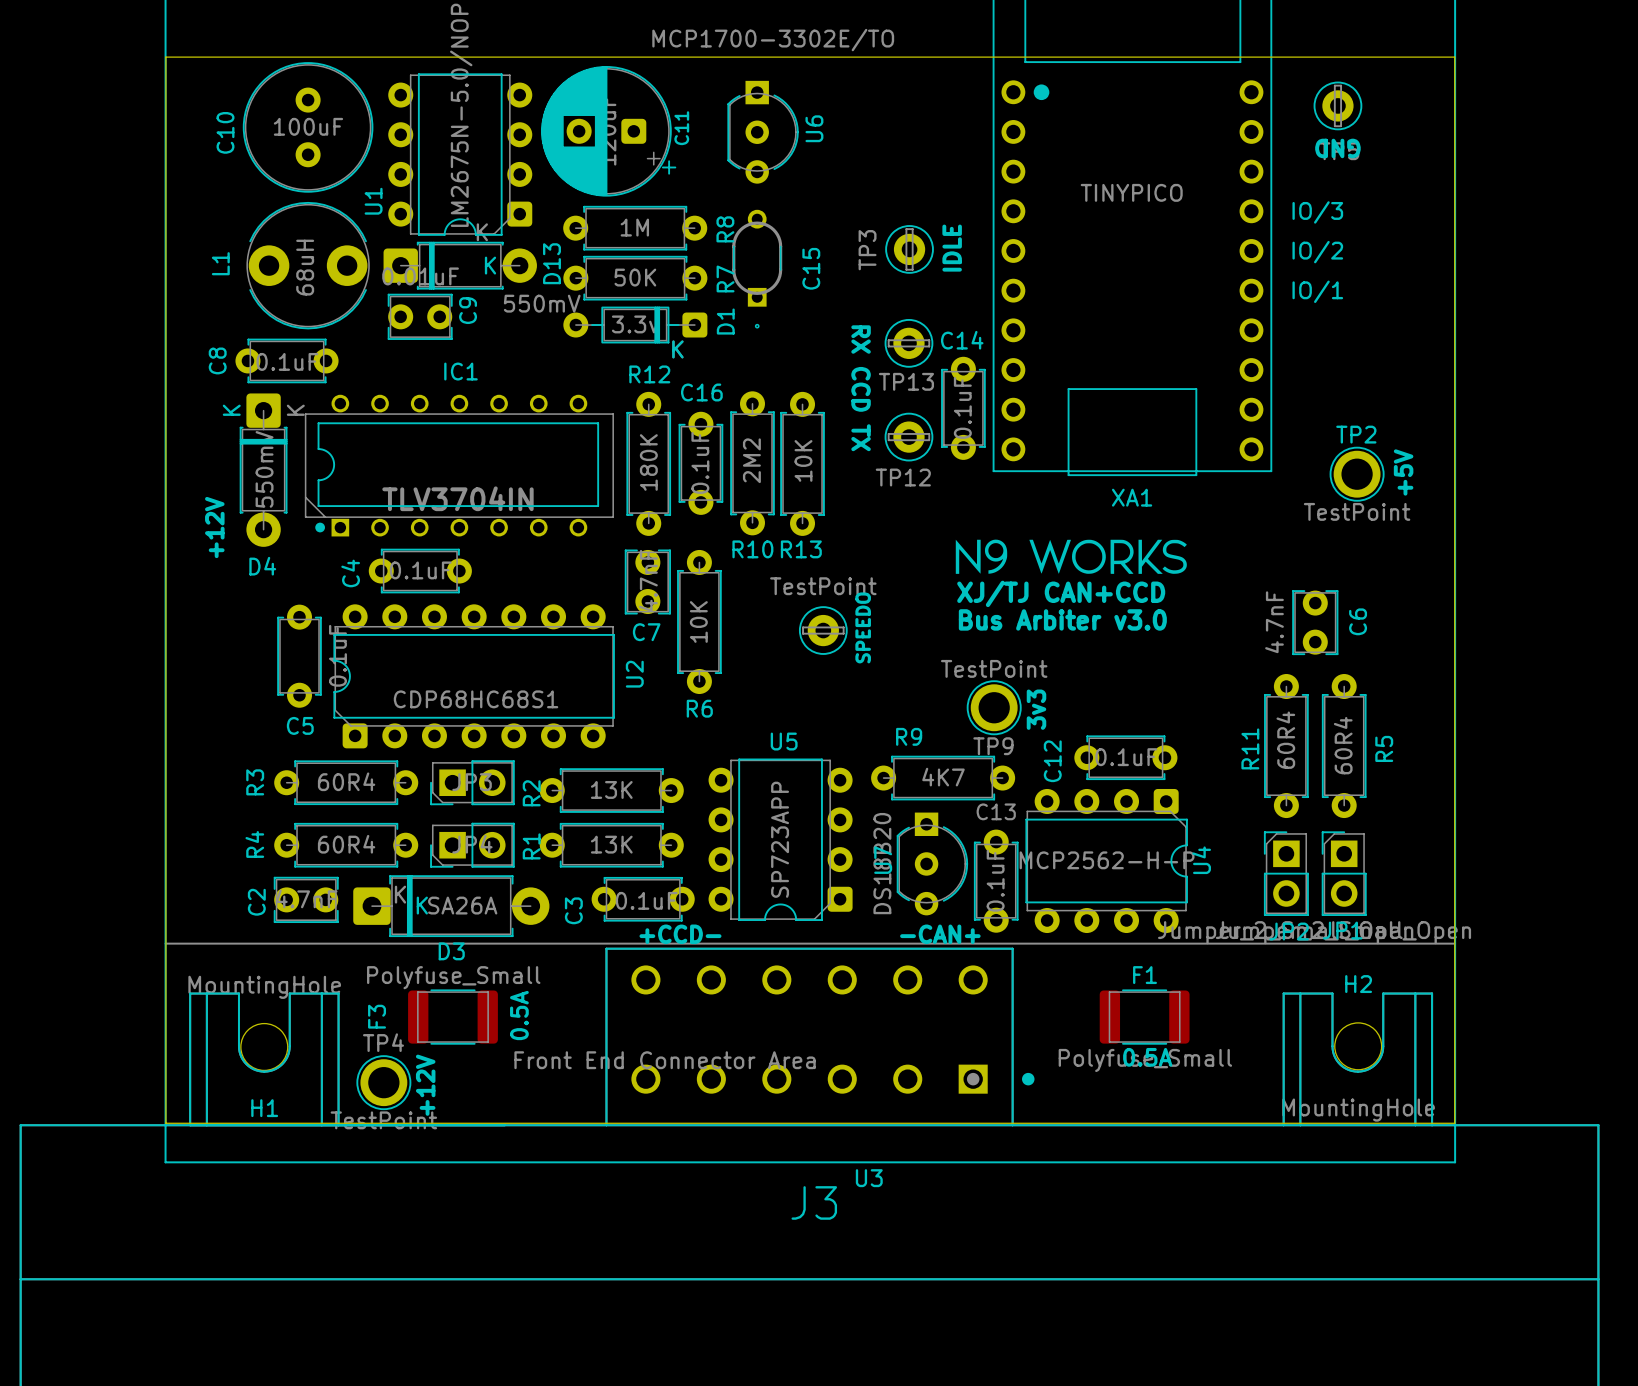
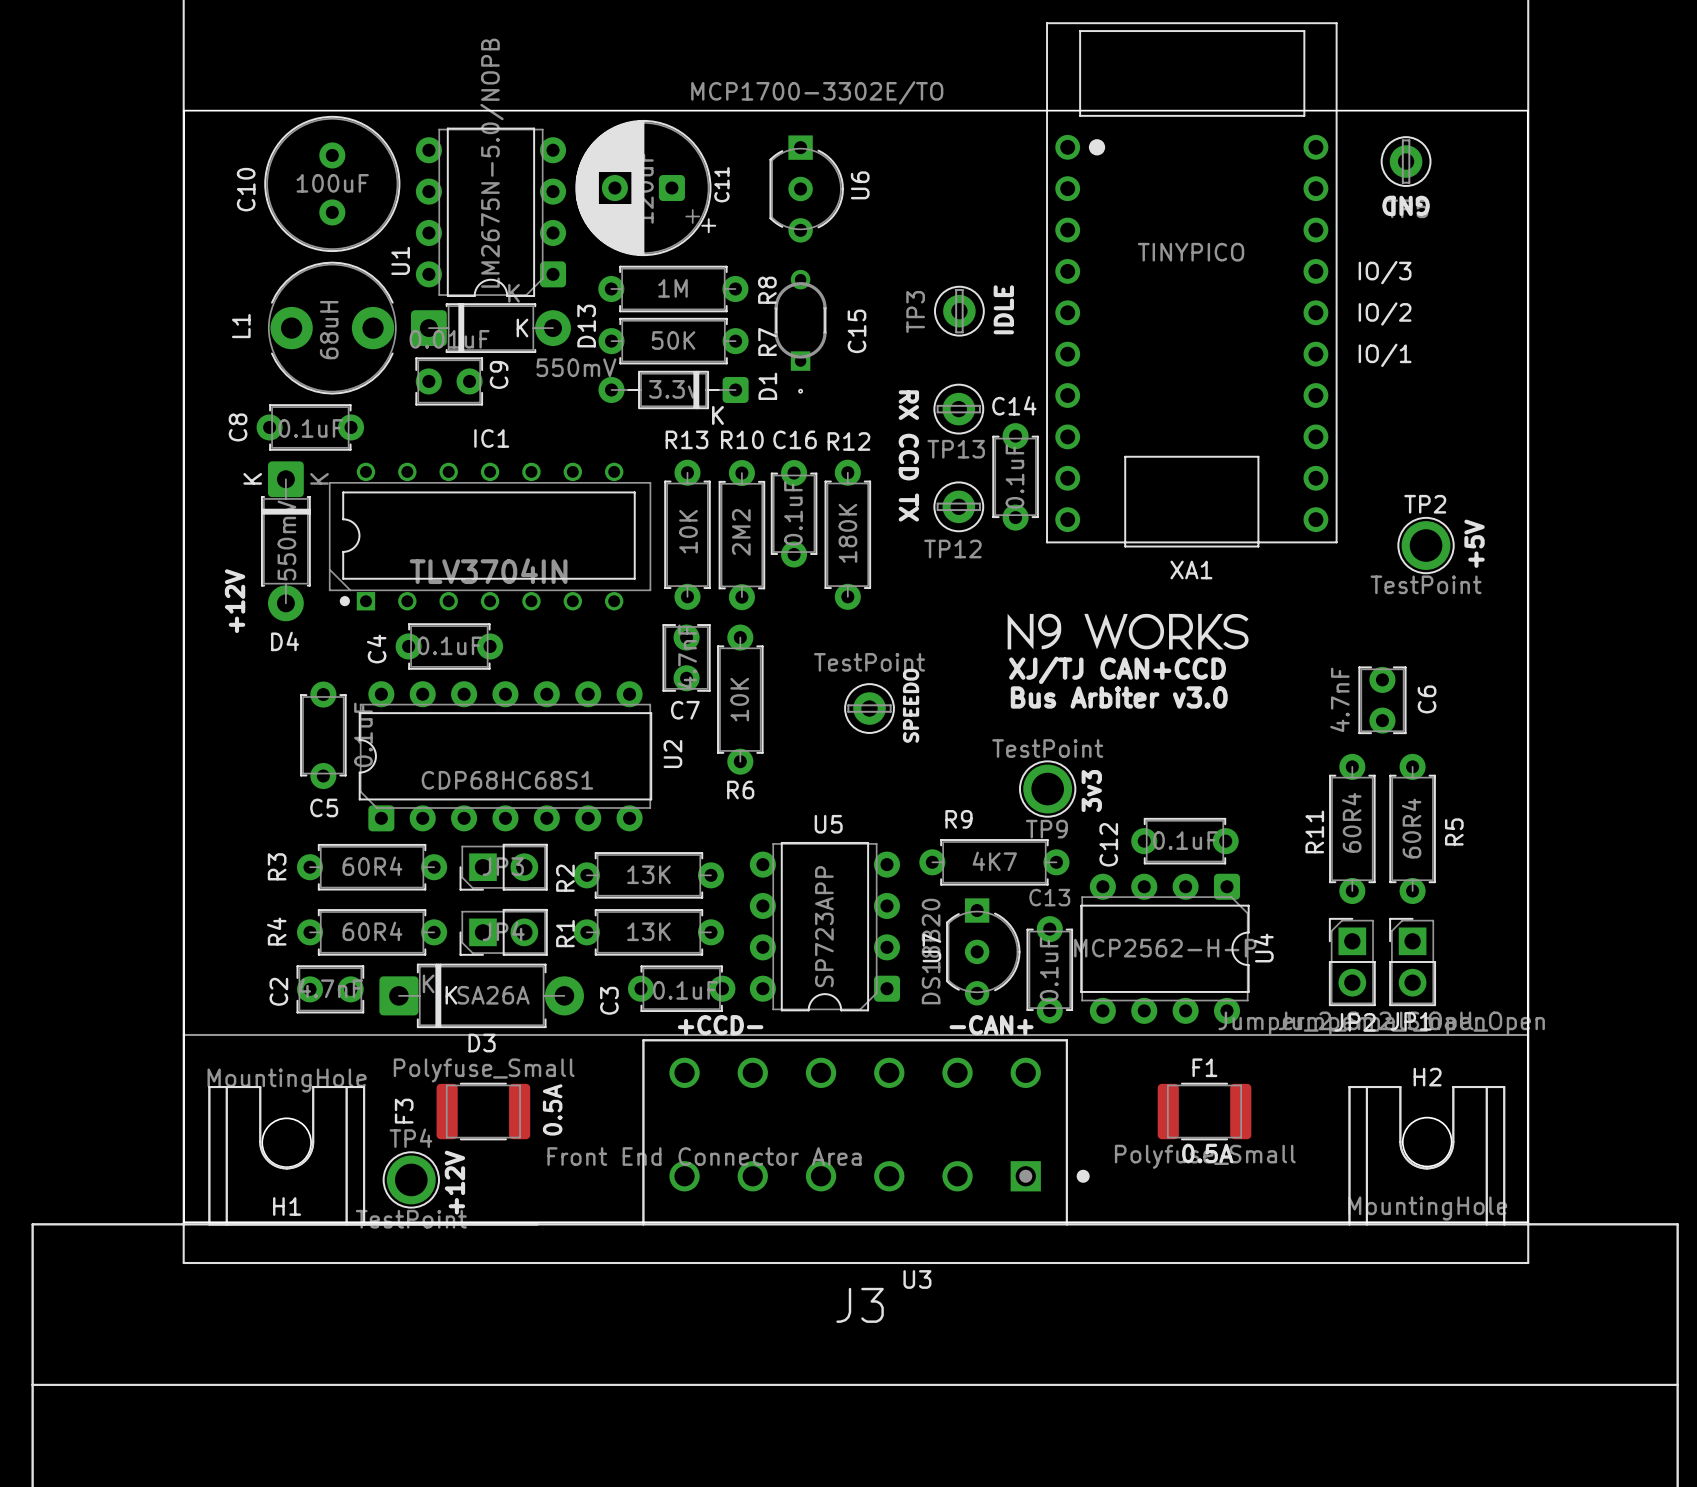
R12 name: R12 (649, 374) -> R13 (686, 439)
R13 value: 10K (803, 460) -> 180K (847, 533)
R12 value: 180K (648, 462) -> 10K (688, 531)
C16 position: (700, 463) -> (794, 513)
R10 position: (752, 463) -> (741, 535)
R10 name position: R10 (752, 549) -> R10 (742, 439)
R13 name: R13 (801, 549) -> R12 (848, 441)

